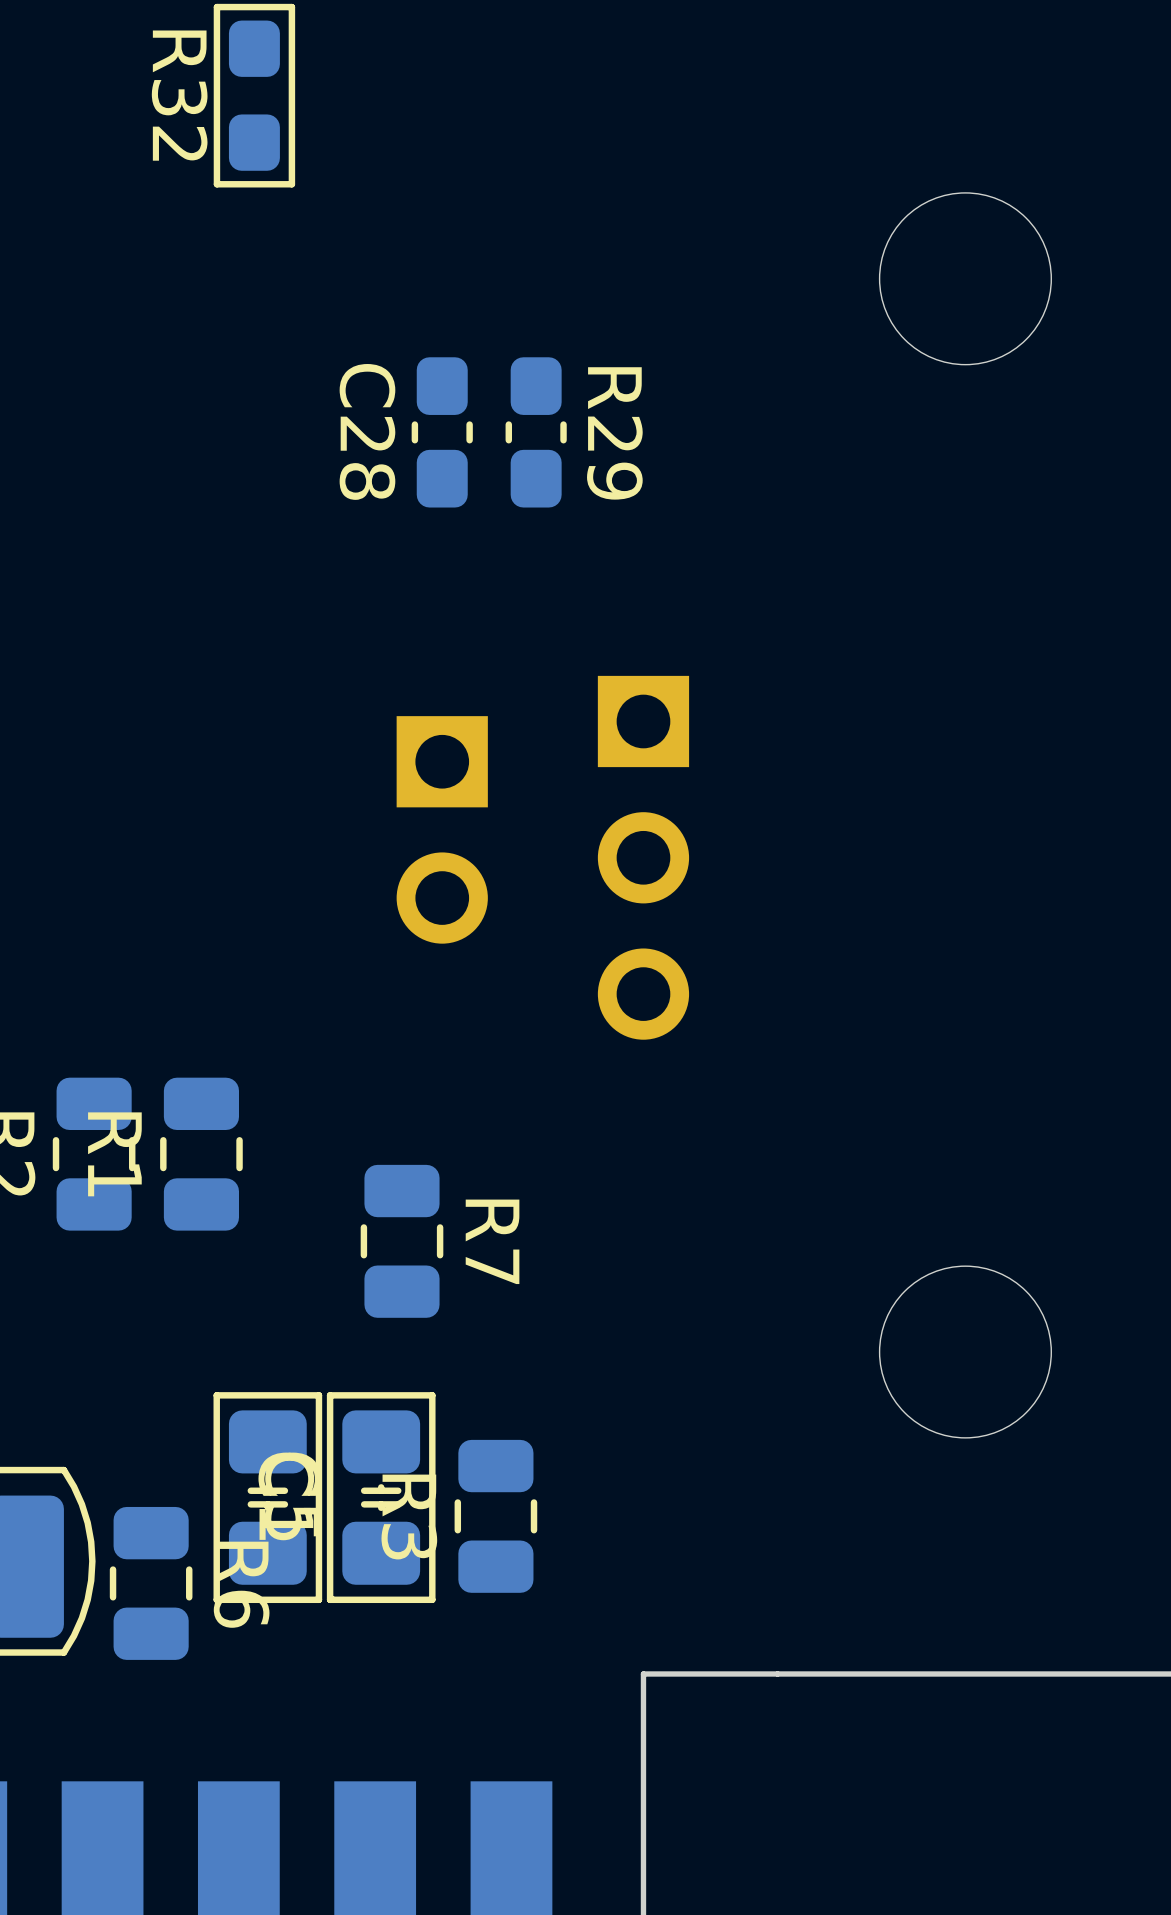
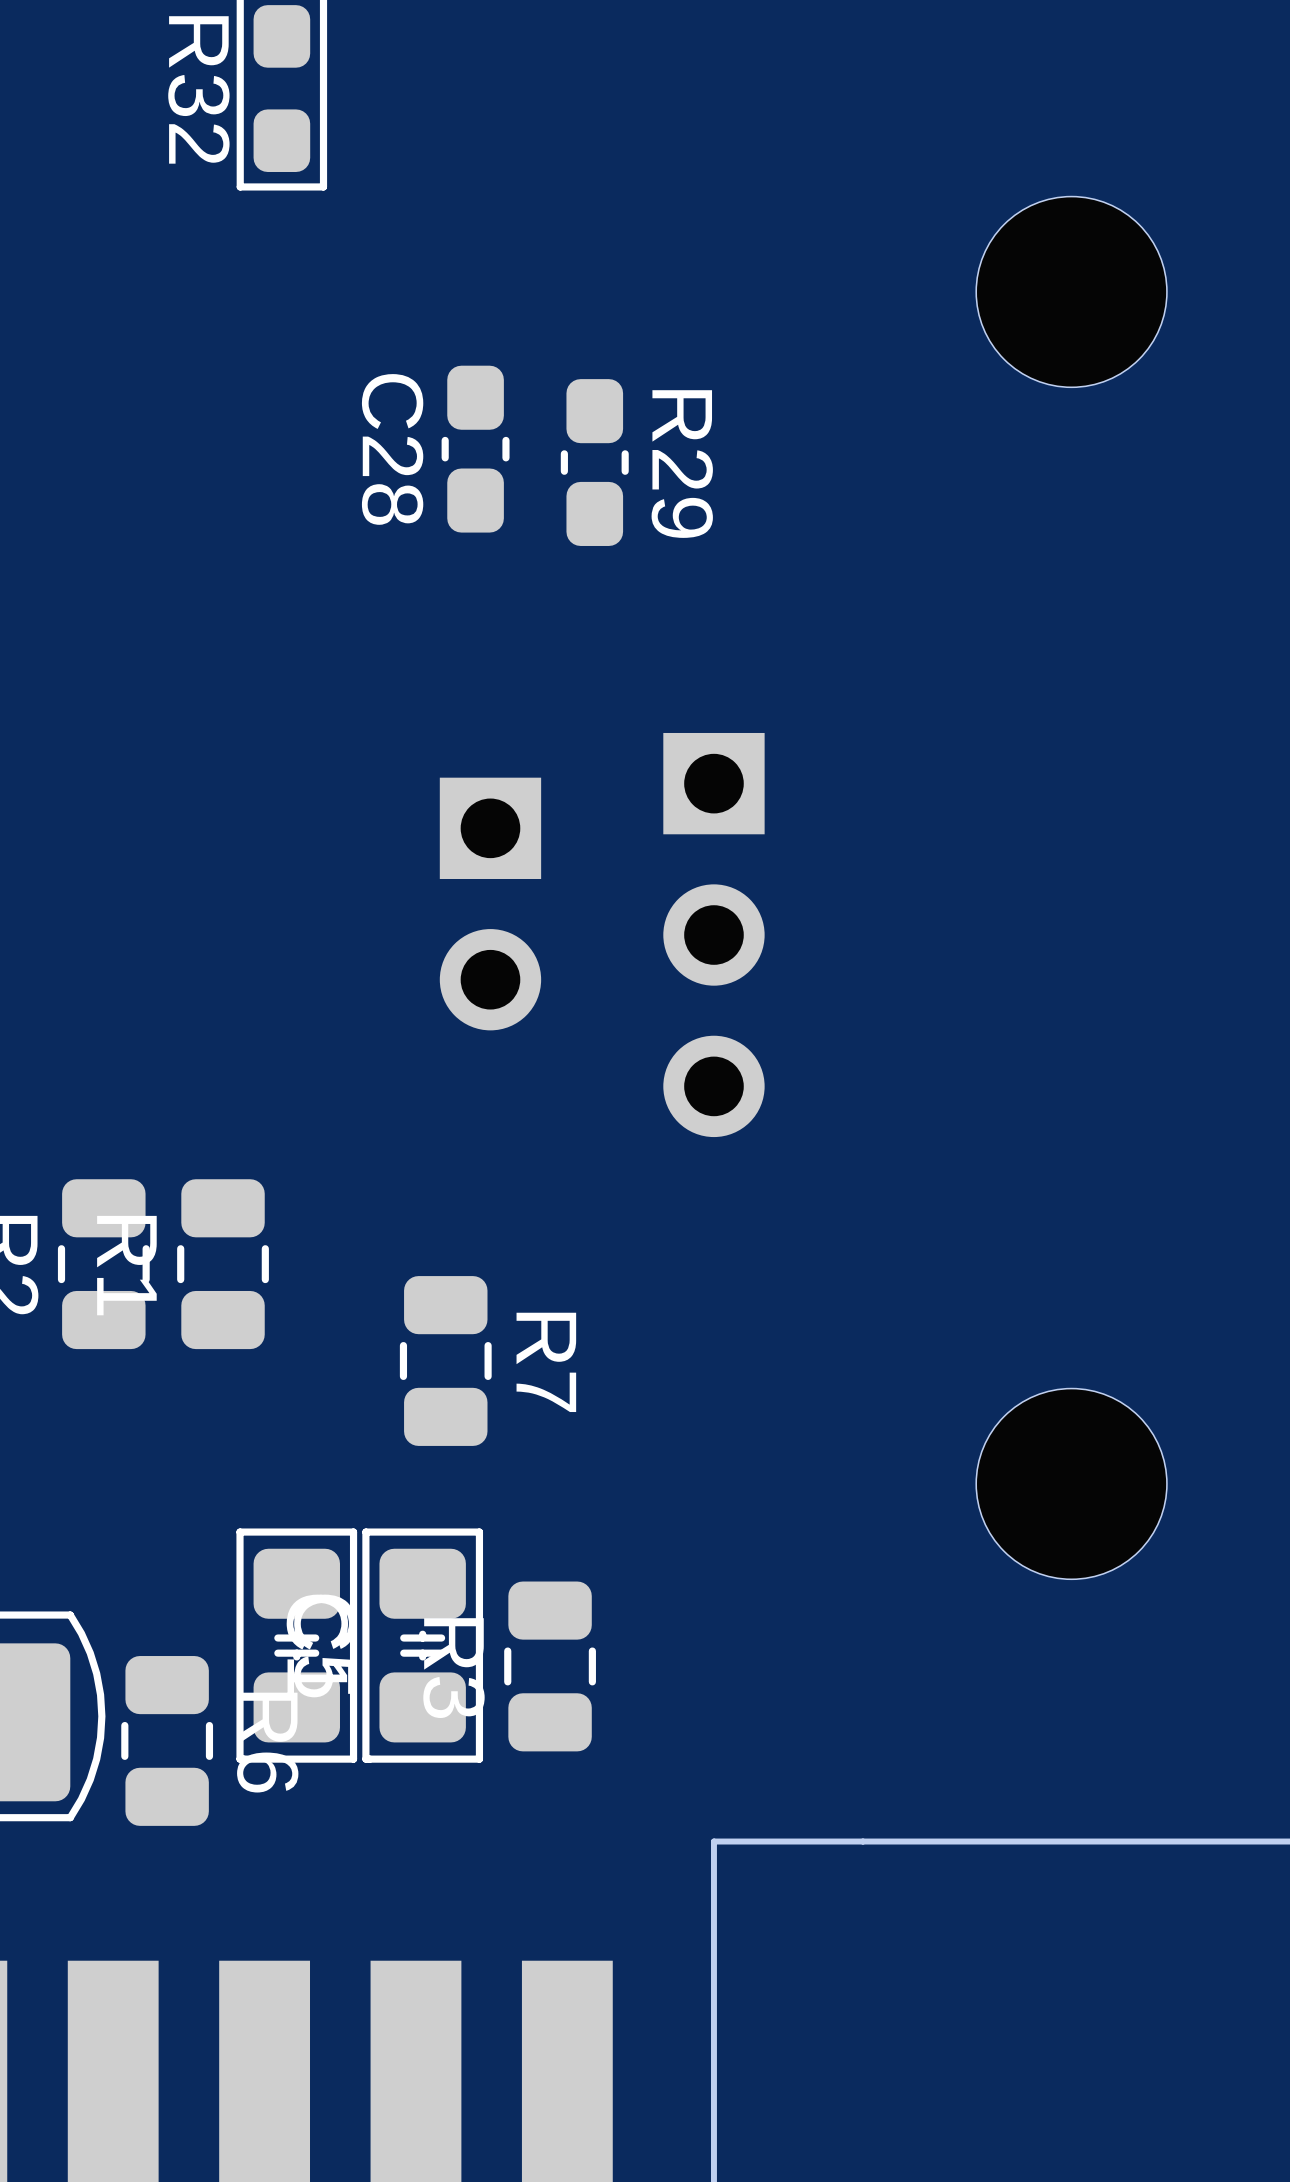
C28 position: (442, 432) -> (475, 449)

